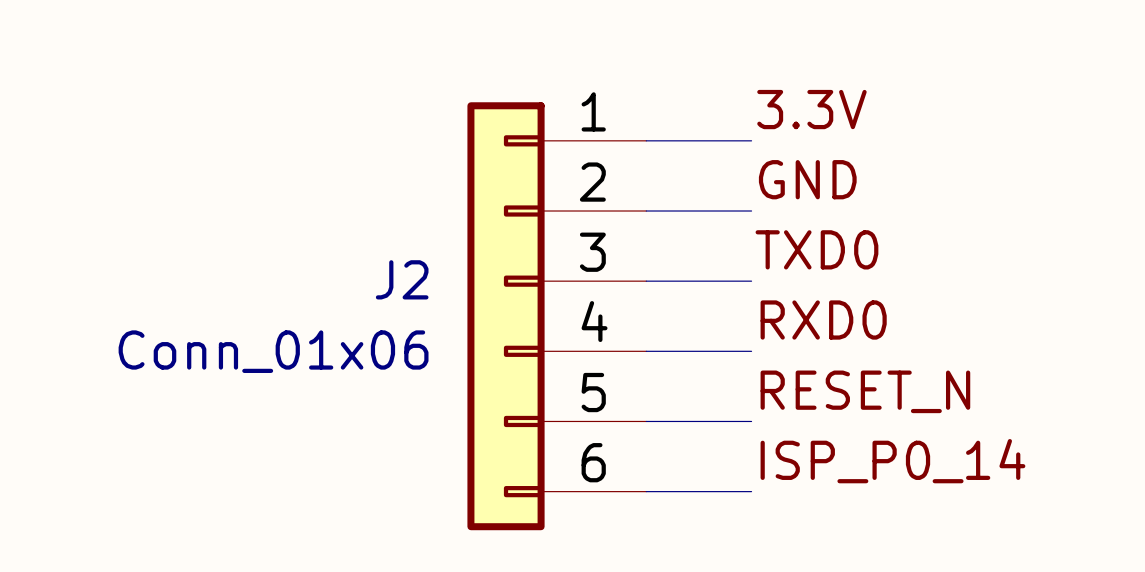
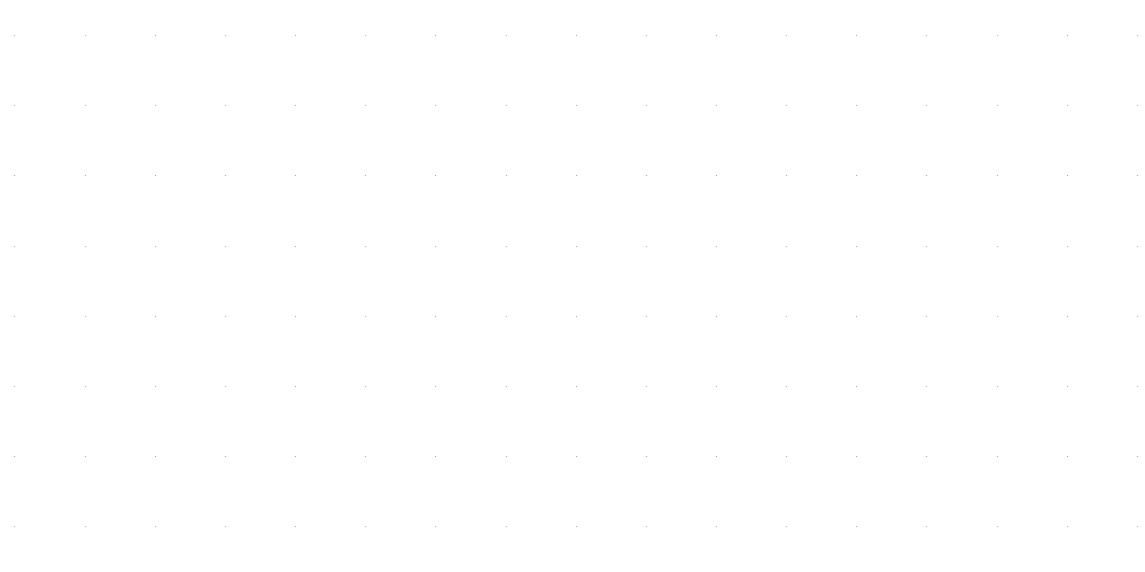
label: 3.3V (811, 109) -> none
wire: (646, 140) (751, 140) -> none
label: GND (807, 179) -> none
wire: (646, 211) (751, 211) -> none
label: TXD0 (816, 249) -> none
wire: (646, 281) (751, 281) -> none
J2: Conn_01x06 (556, 316) -> none
label: RXD0 (823, 320) -> none
wire: (646, 351) (751, 351) -> none
label: RESET_N (865, 391) -> none
wire: (646, 421) (751, 421) -> none
label: ISP_P0_14 (892, 461) -> none
wire: (646, 491) (751, 491) -> none

